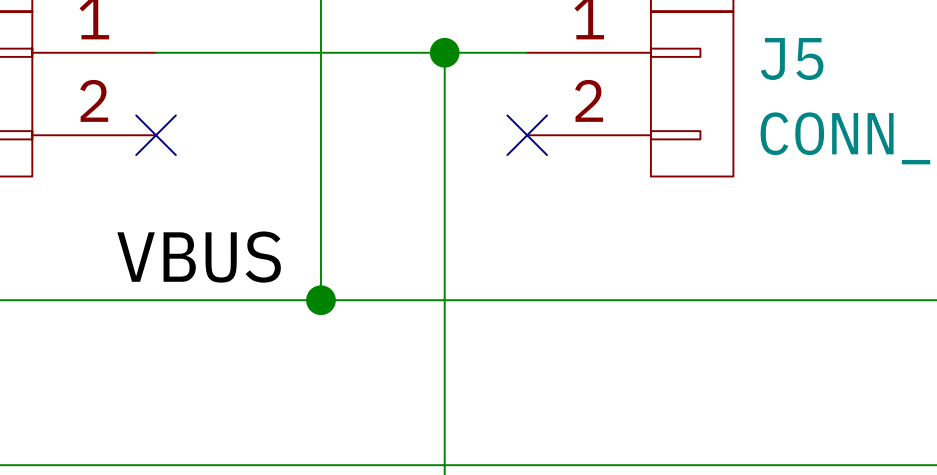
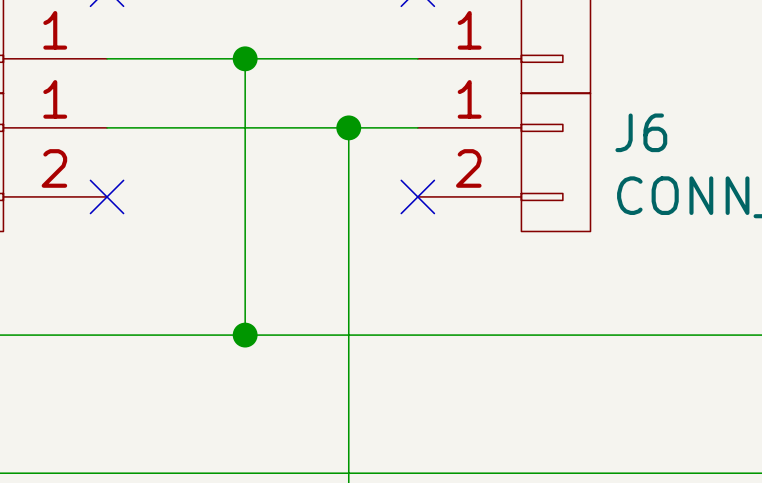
J5 name: J5 (792, 59) -> J6 (641, 132)
label: VBUS (199, 257) -> none

